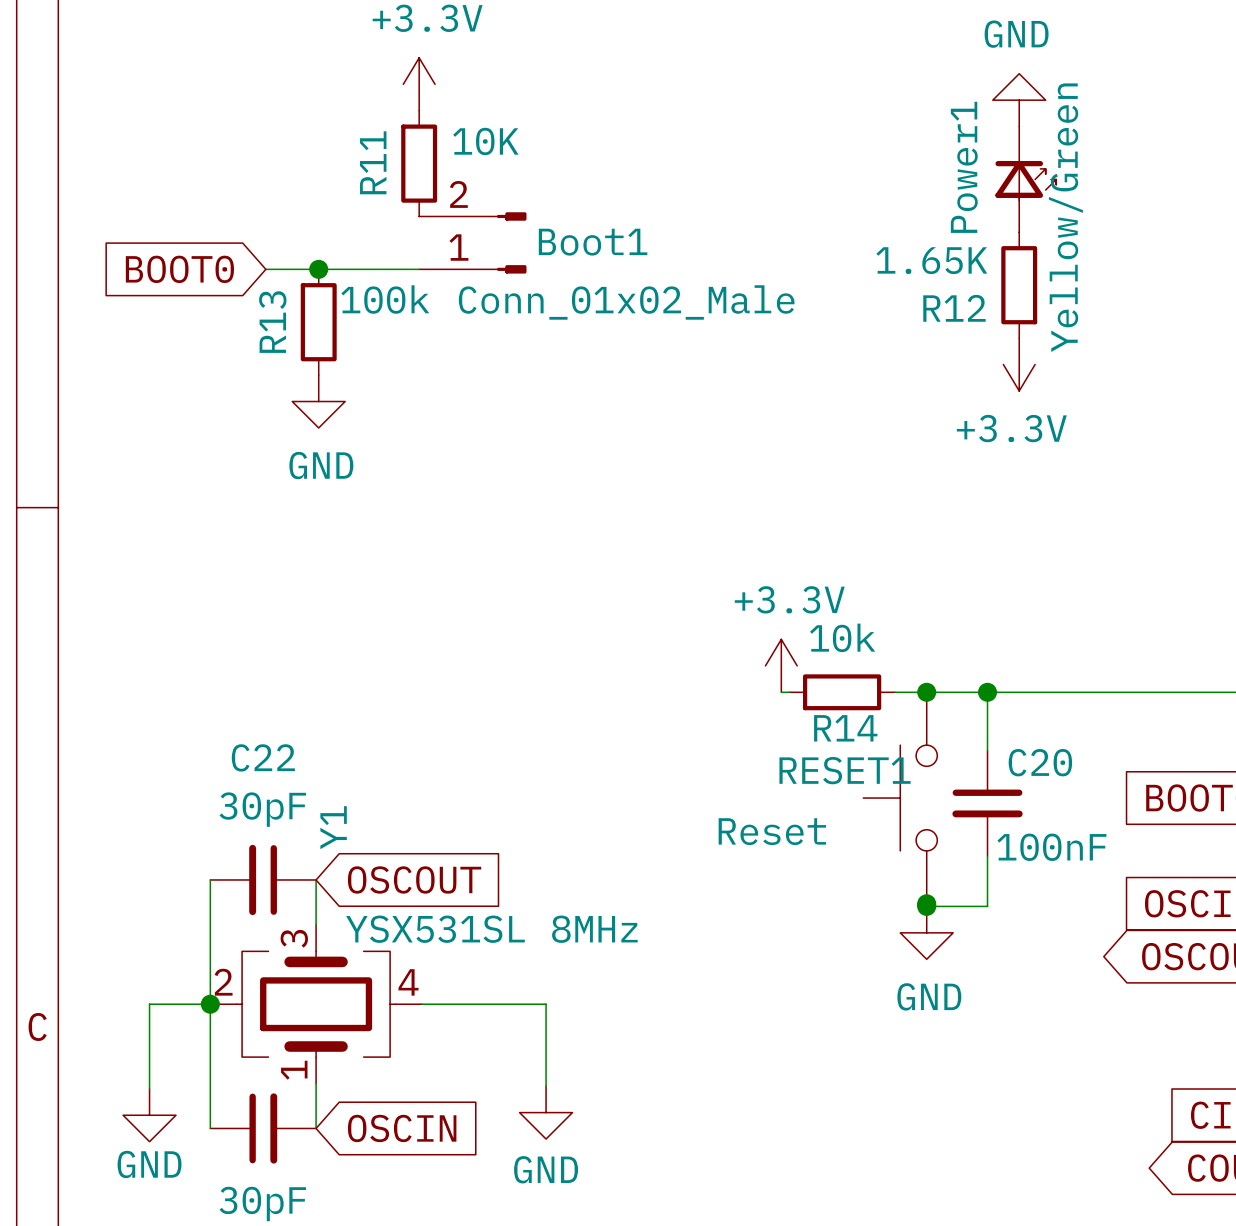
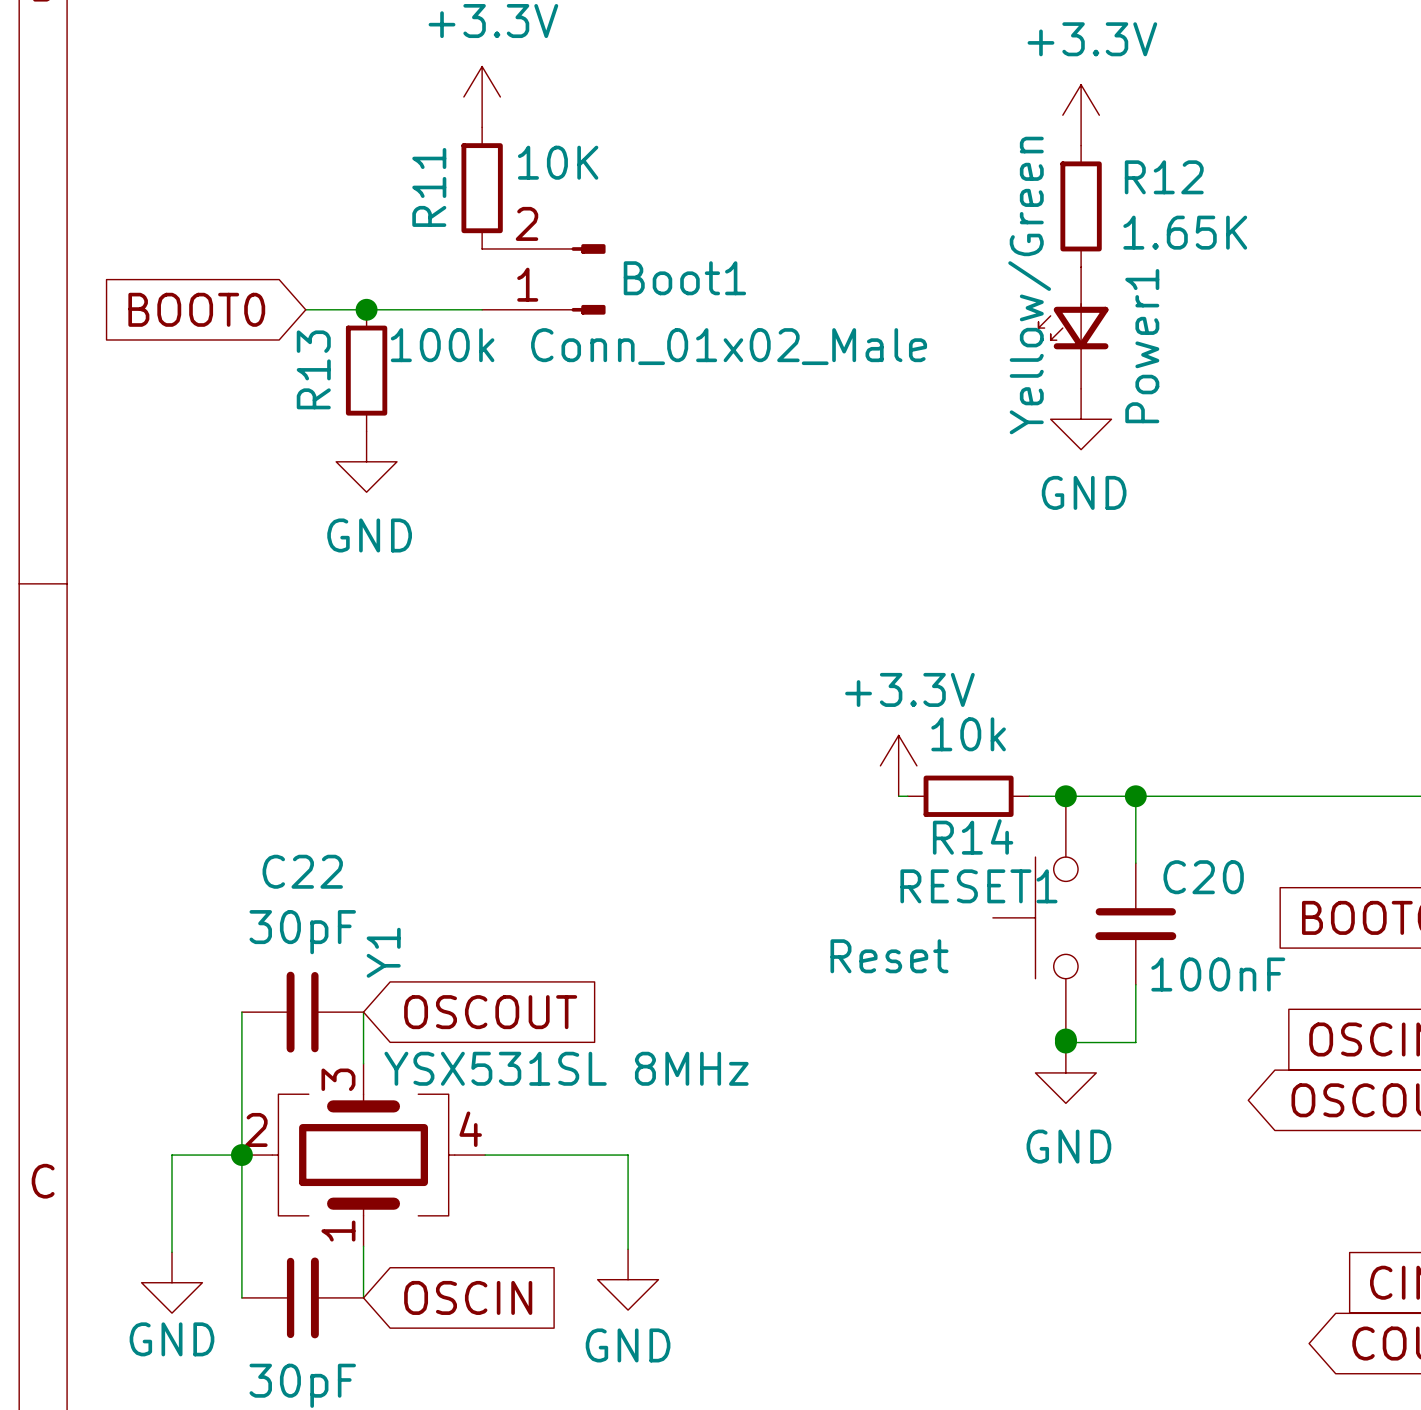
power symbol rotation: 0° (1019, 100) -> 180° (1081, 419)
power symbol position: GND (1019, 100) -> GND (1081, 419)
Power1 position: (1025, 179) -> (1073, 328)
Power1 rotation: 0° (1025, 180) -> 180° (1073, 326)
R12 value position: 1.65K (931, 260) -> 1.65K (1185, 232)
R12 position: (1019, 285) -> (1081, 206)
R12 name position: R12 (954, 308) -> R12 (1164, 177)
power symbol rotation: 0° (1019, 364) -> 180° (1081, 115)
power symbol position: +3.3V (1019, 364) -> +3.3V (1081, 115)

